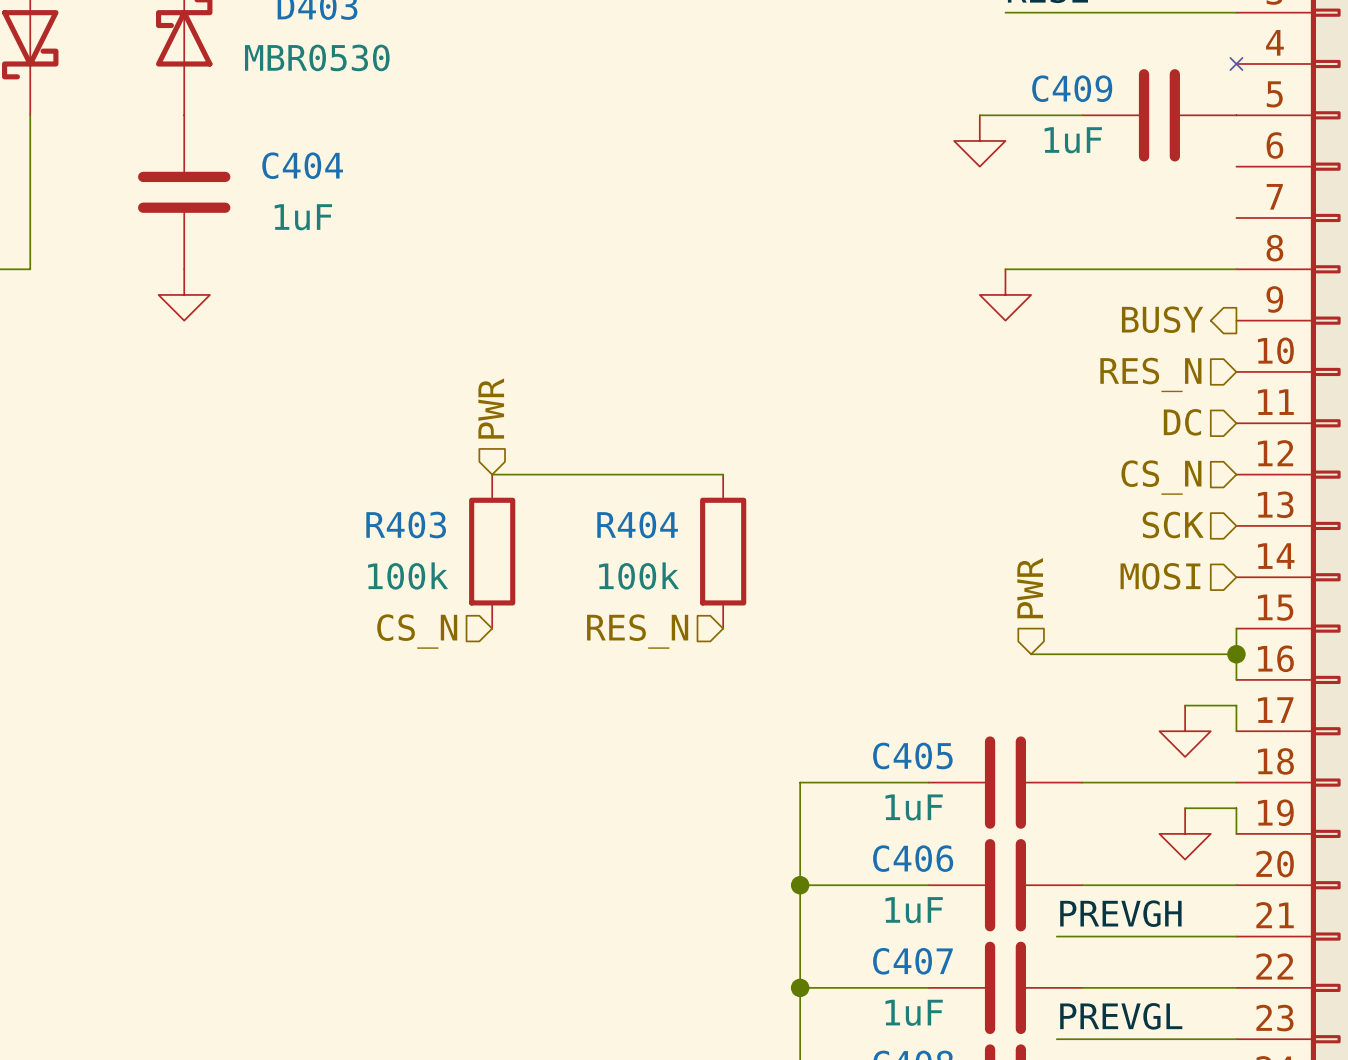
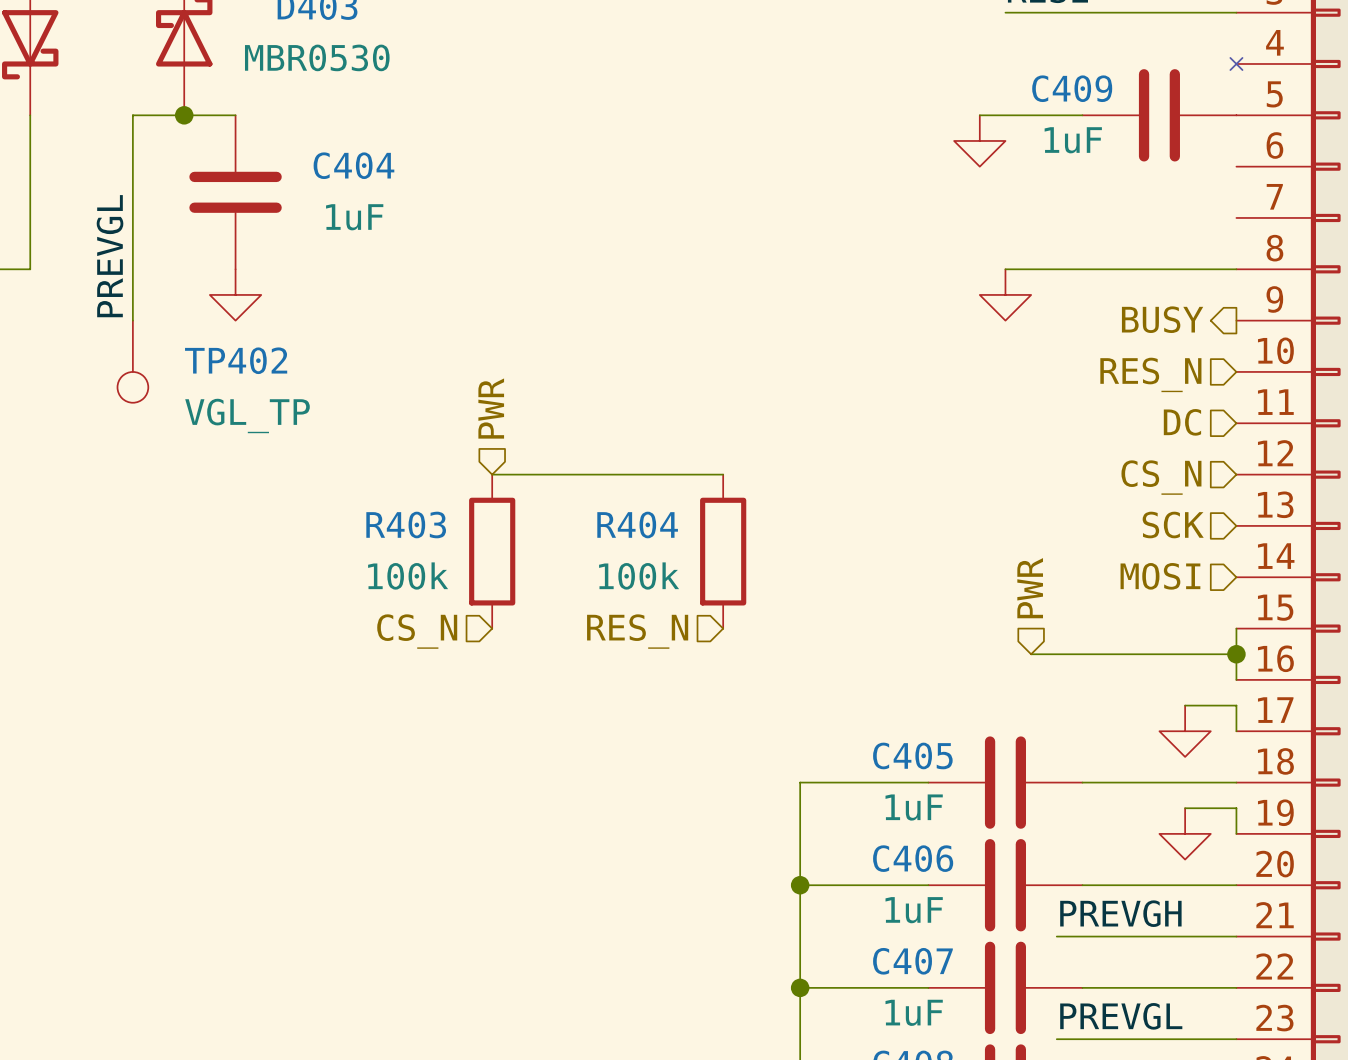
junction: none -> (184, 115)
wire: none -> (235, 115) (132, 115) (132, 320)
C404 position: (184, 192) -> (235, 192)
label: none -> PREVGL (110, 256)
power symbol position: (184, 294) -> (235, 294)
TP402: none -> VGL_TP (132, 361)

